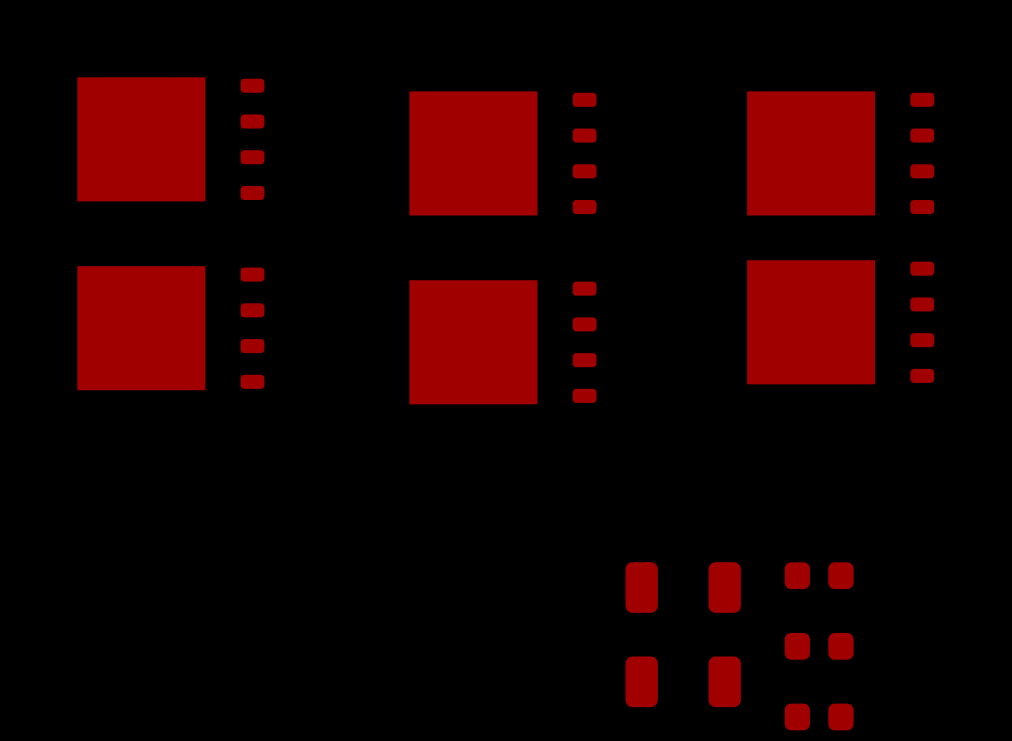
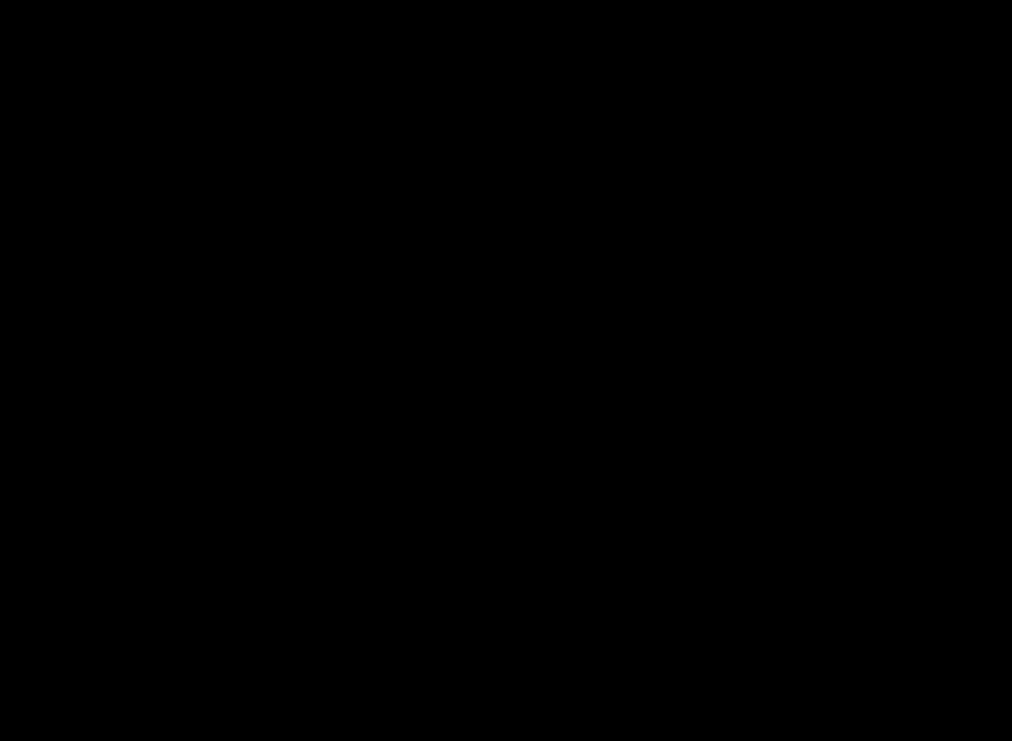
part: (170, 139) -> none
part: (502, 153) -> none
part: (840, 153) -> none
part: (840, 322) -> none
part: (170, 328) -> none
part: (502, 342) -> none
part: (819, 575) -> none
part: (683, 587) -> none
part: (819, 646) -> none
part: (683, 681) -> none
part: (819, 716) -> none

